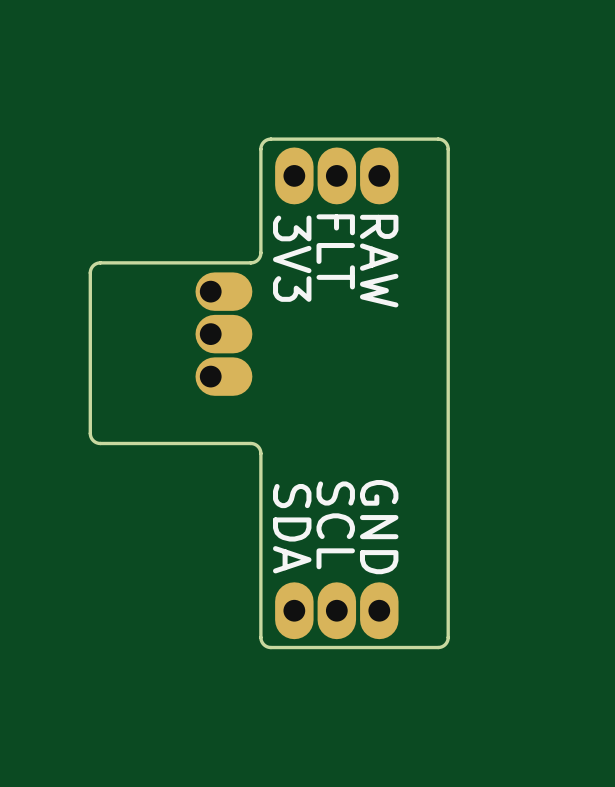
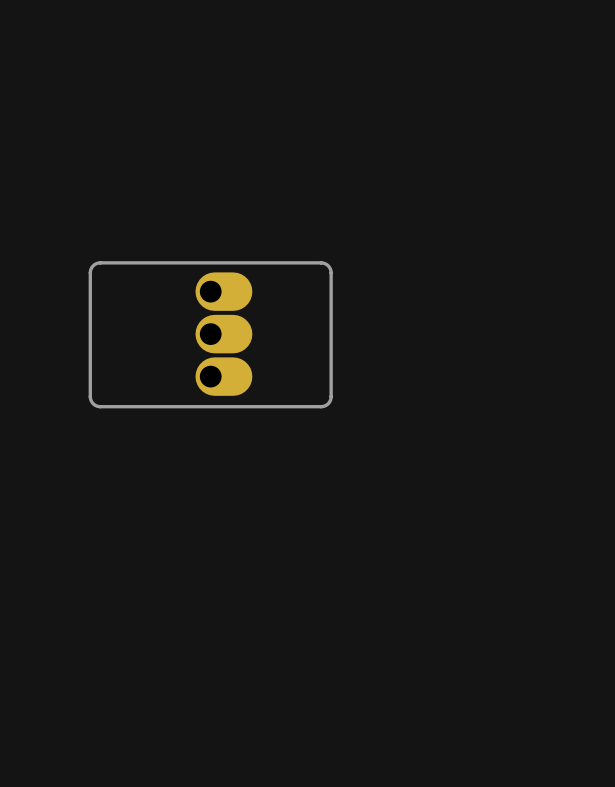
part: (336, 175) -> none
text: FLT (335, 251) -> none
text: 3V3 (292, 258) -> none
text: RAW (379, 261) -> none
board edge: (250, 262) (257, 259) (260, 254) (260, 149) (265, 140) (438, 139) (446, 144) (448, 637) (444, 645) (438, 647) (270, 647) (264, 645) (260, 637) (260, 453) (258, 447) (250, 443) (97, 443) (93, 440) (90, 434) (90, 396) -> (250, 262) (321, 262) (329, 267) (331, 396) (327, 404) (321, 406) (100, 406) (93, 403) (90, 396)
text: SCL (335, 525) -> none
text: GND (379, 527) -> none
text: SDA (292, 528) -> none
part: (336, 610) -> none

